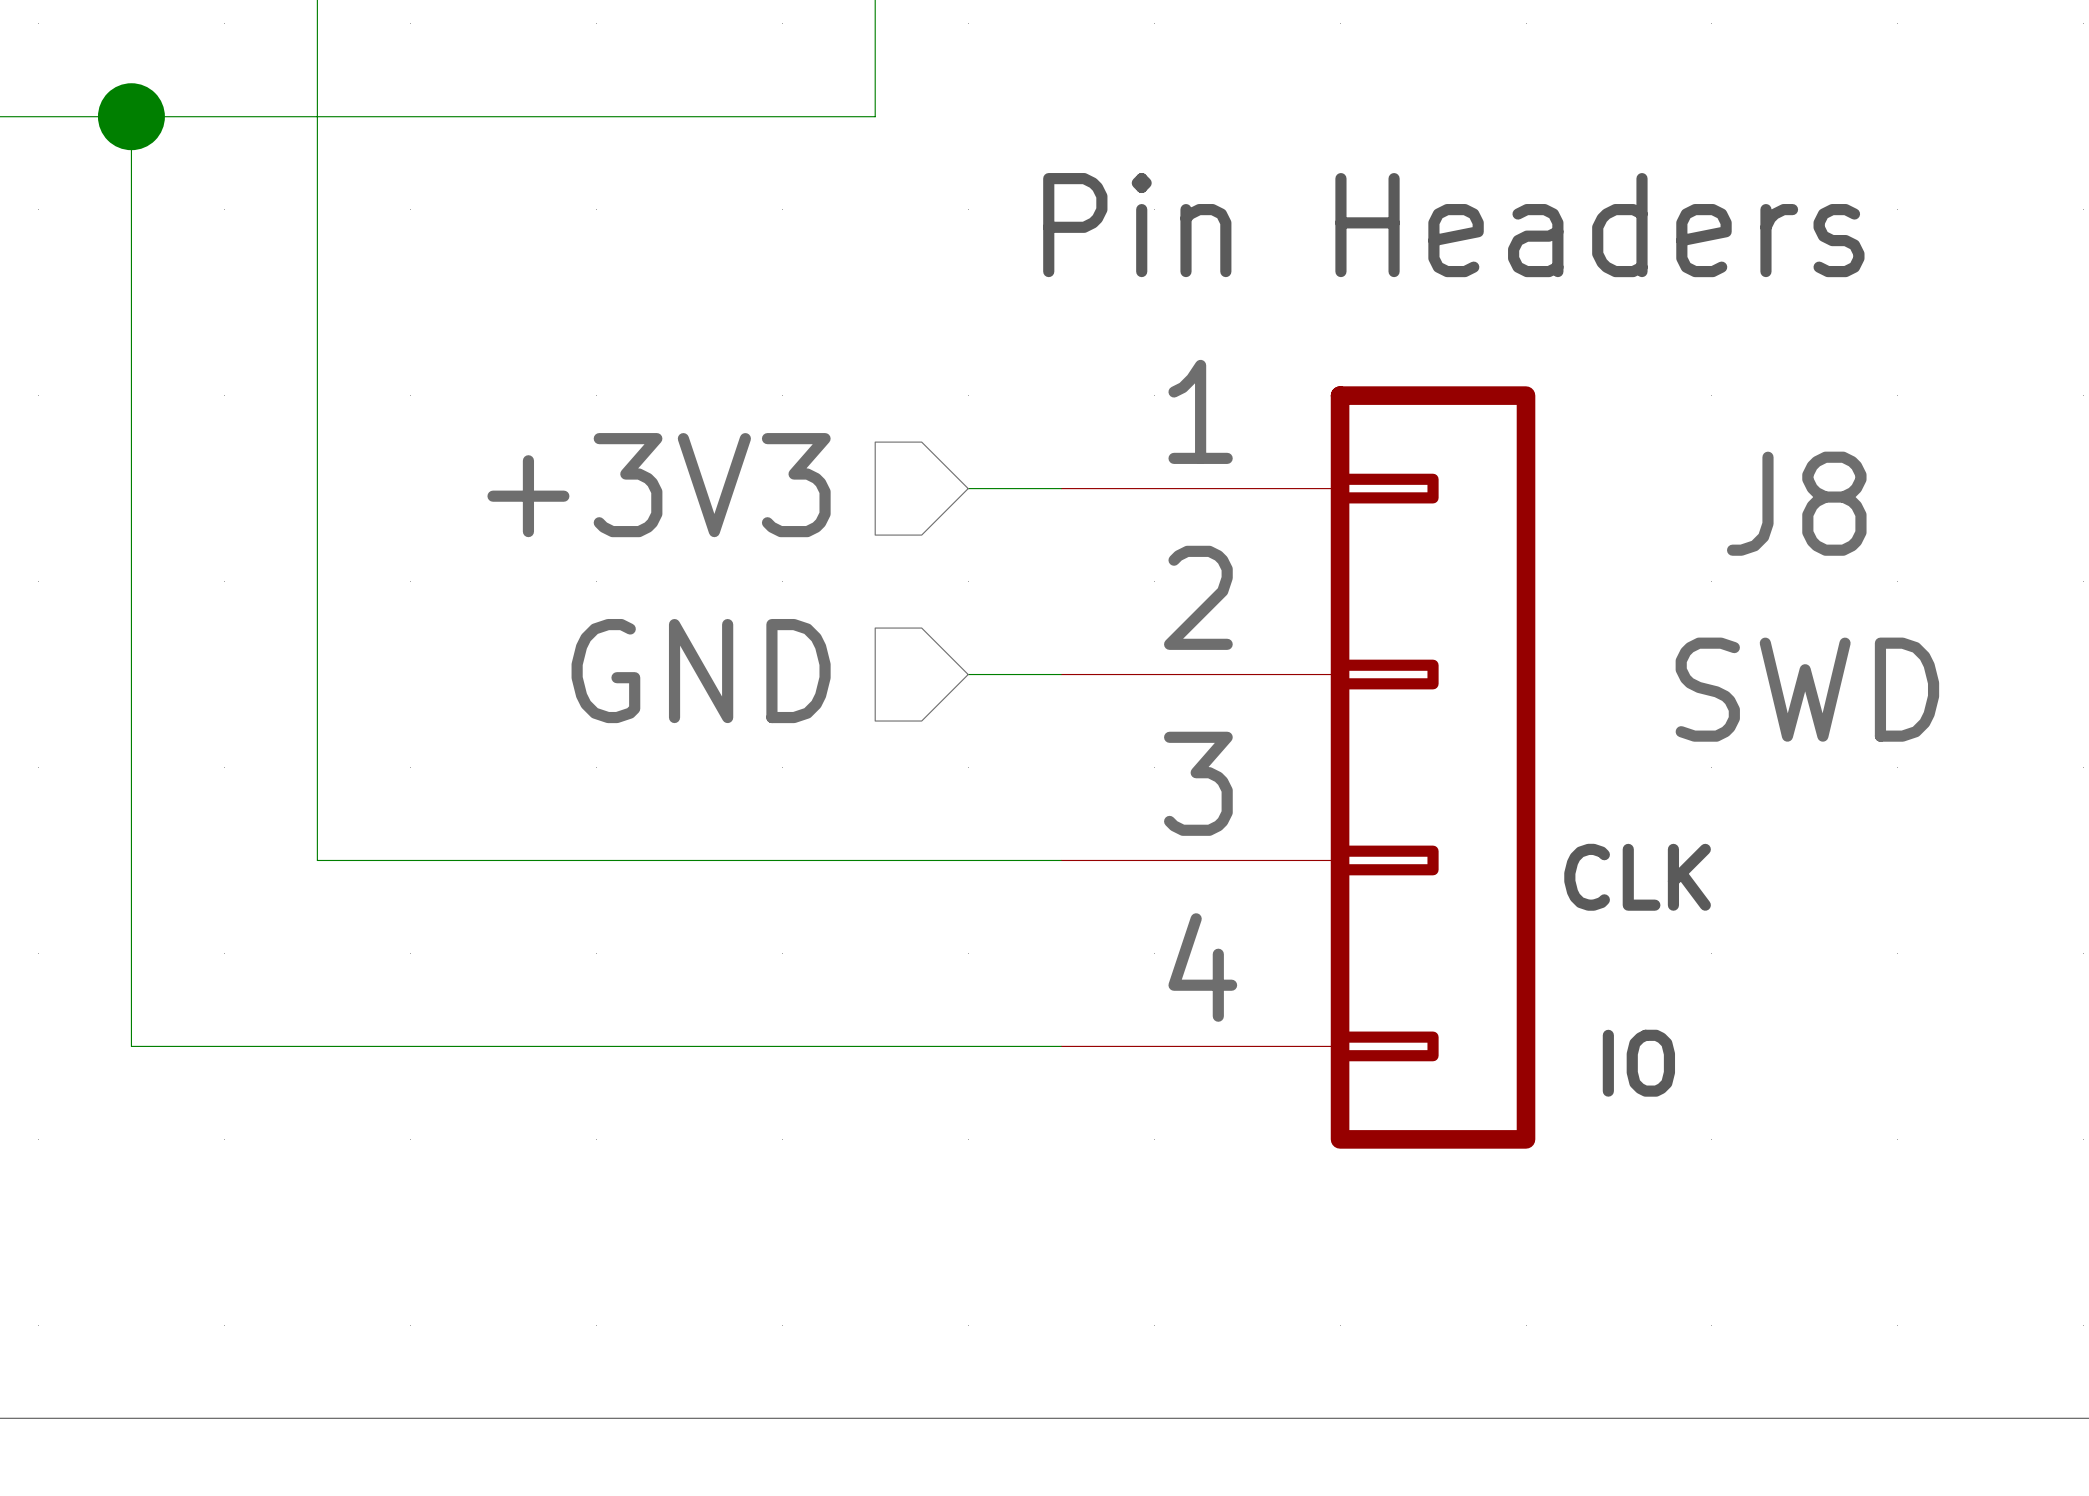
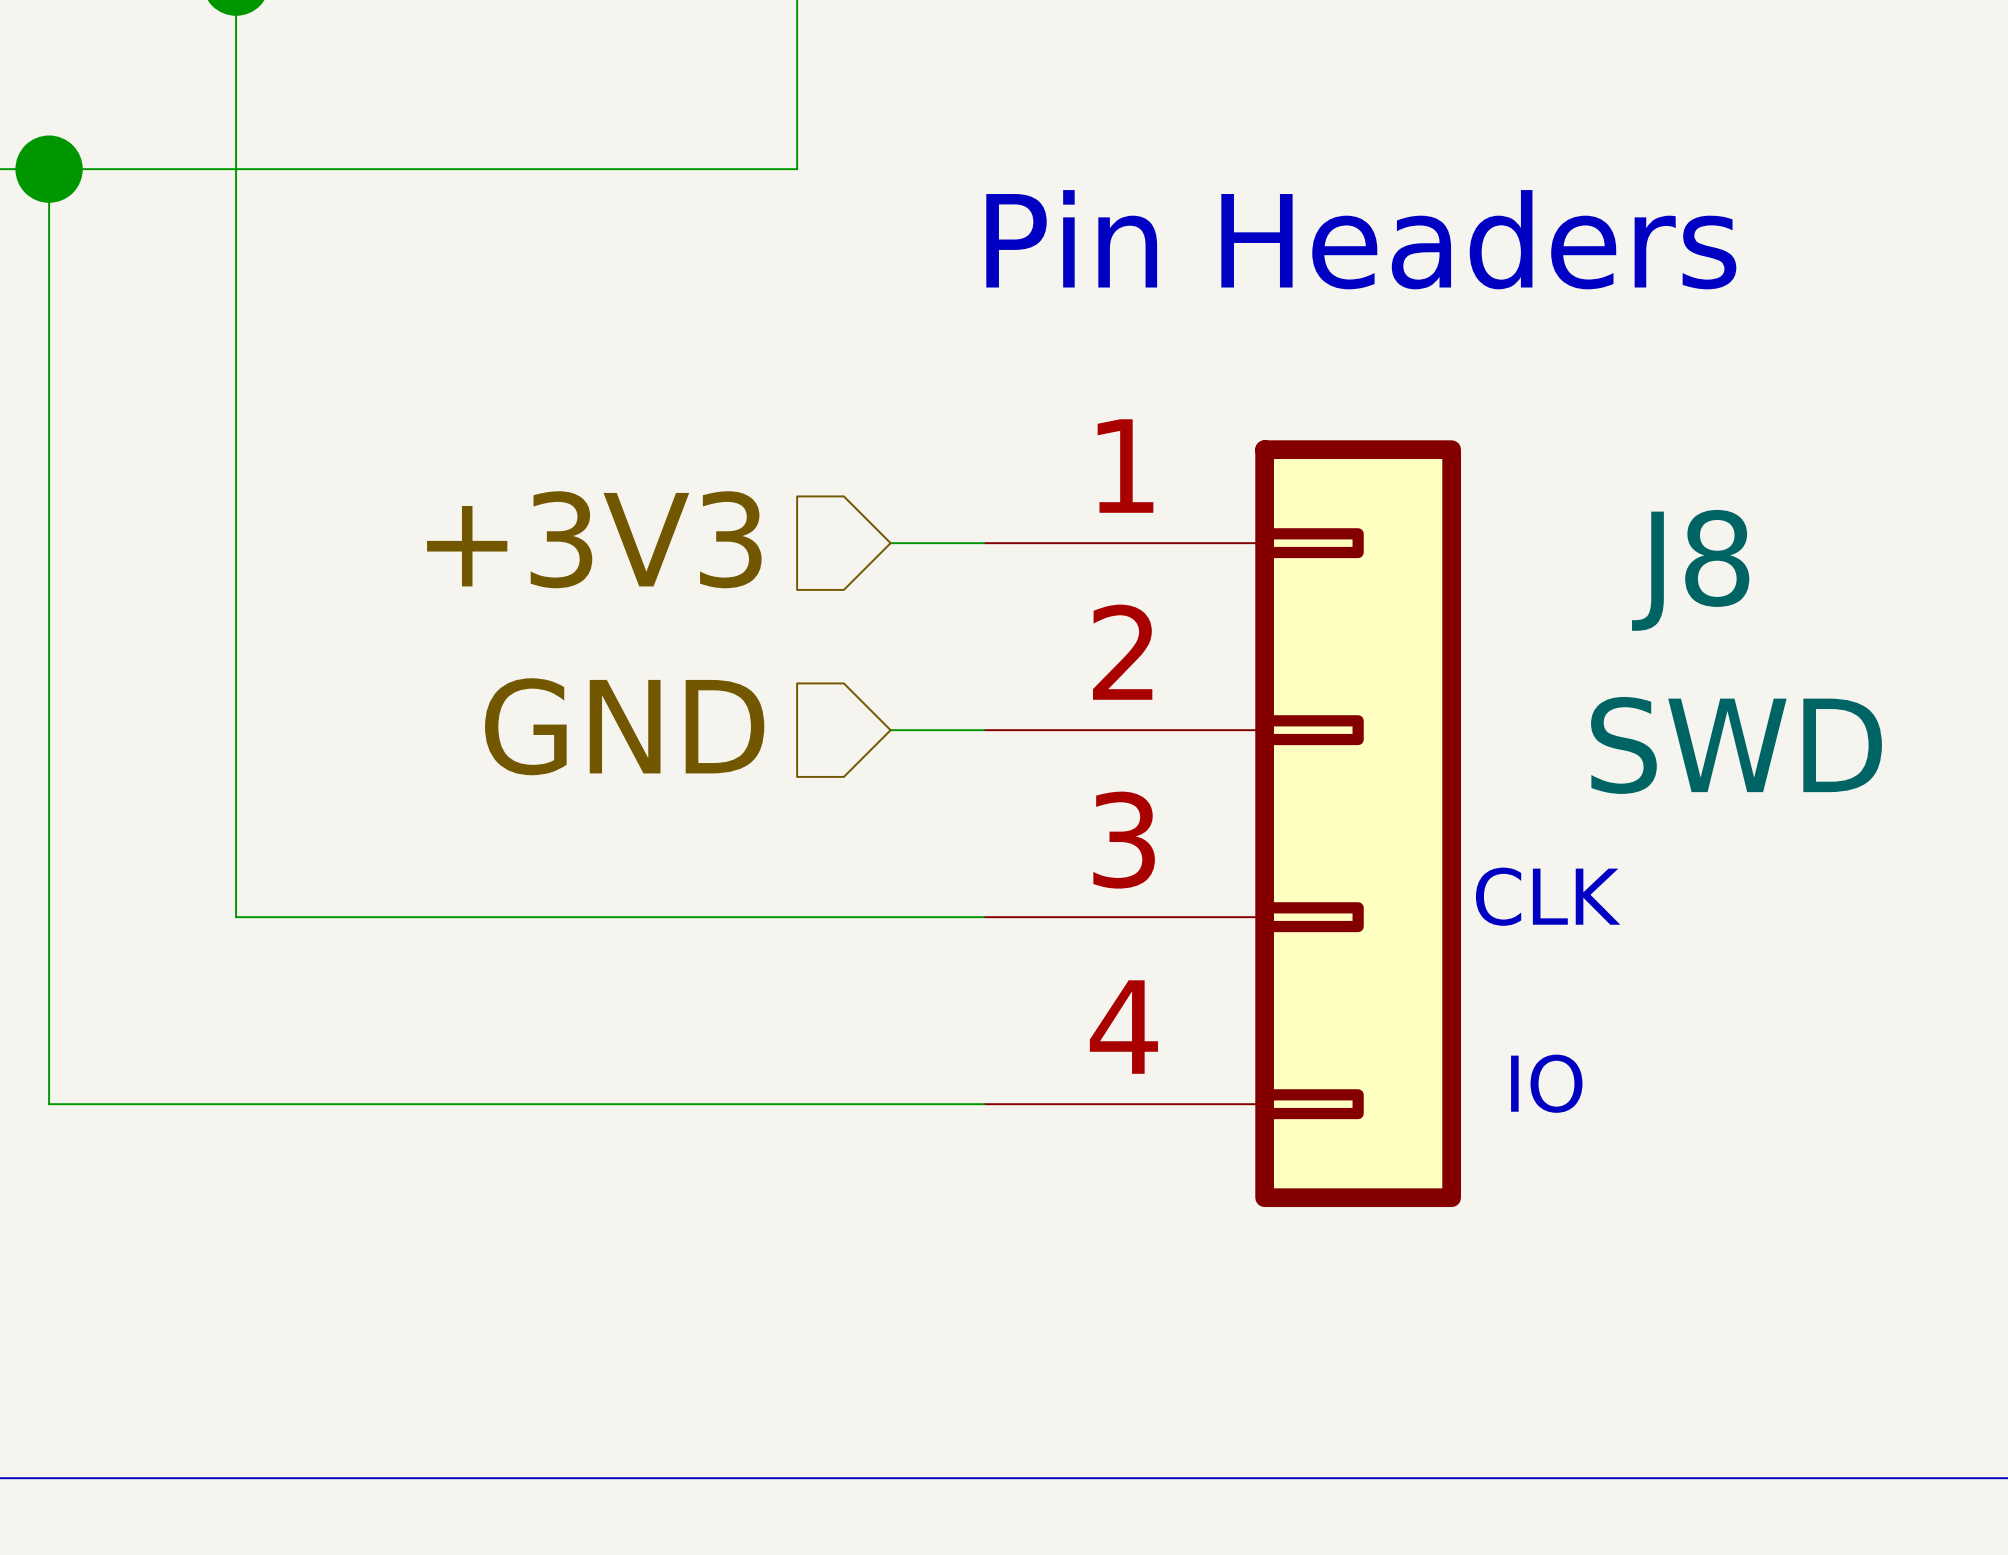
text position: Pin Headers (1453, 225) -> Pin Headers (1361, 239)
text position: CLK (1637, 877) -> CLK (1548, 896)
text position: IO (1638, 1063) -> IO (1546, 1083)

